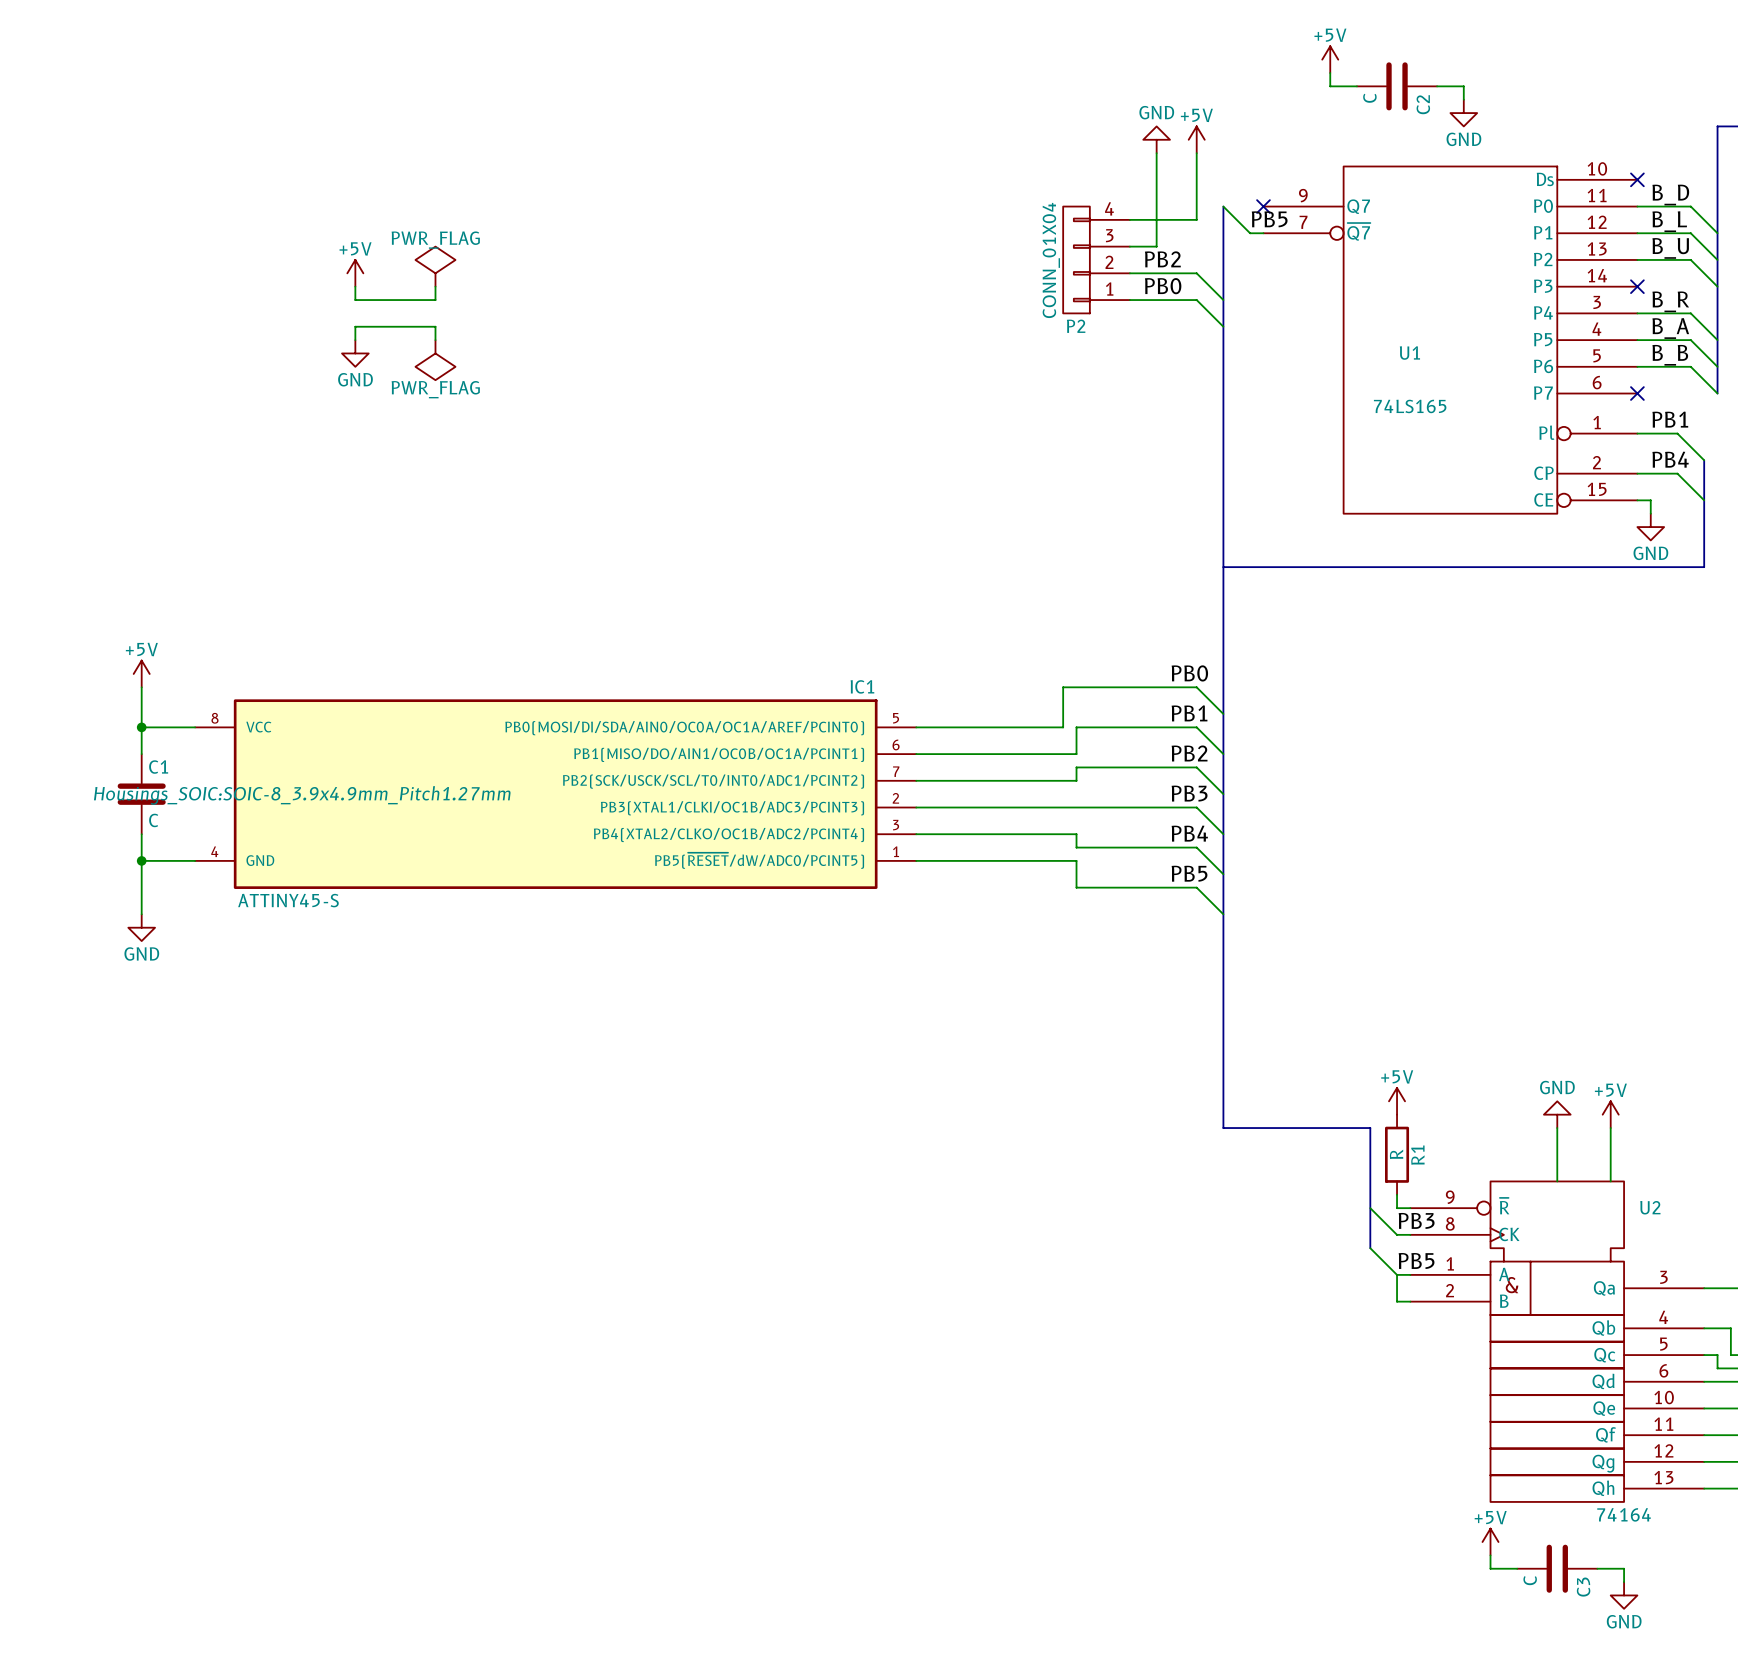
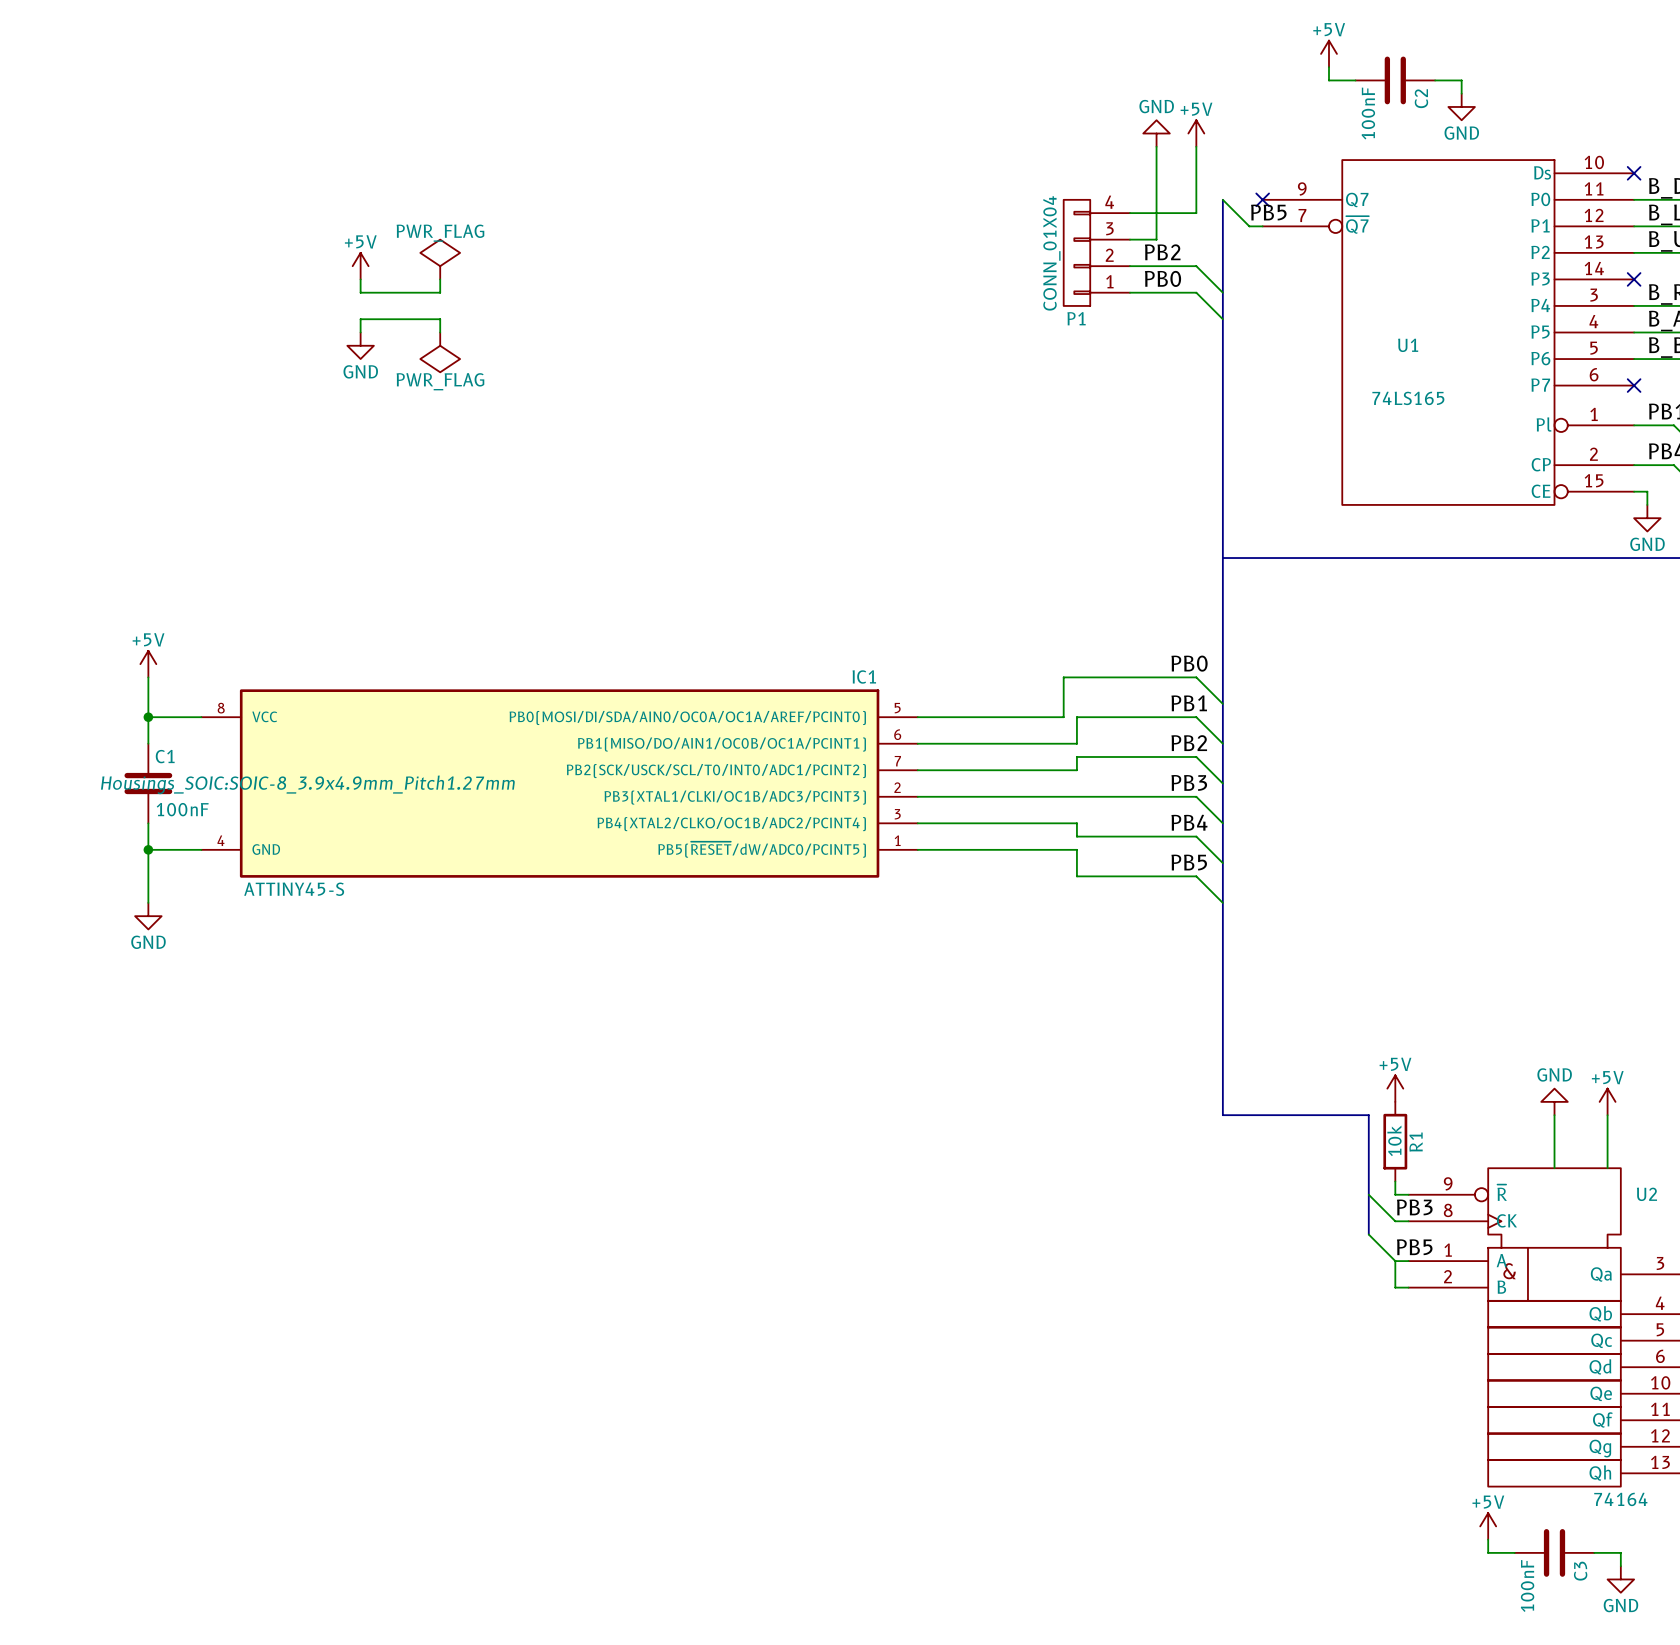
C2 value: C (1369, 98) -> 100nF (1368, 113)
P2 name: P2 (1076, 326) -> P1 (1076, 318)
C1 value: C (153, 820) -> 100nF (182, 809)
R1 value: R (1396, 1154) -> 10k (1394, 1140)
C3 value: C (1530, 1580) -> 100nF (1527, 1585)

